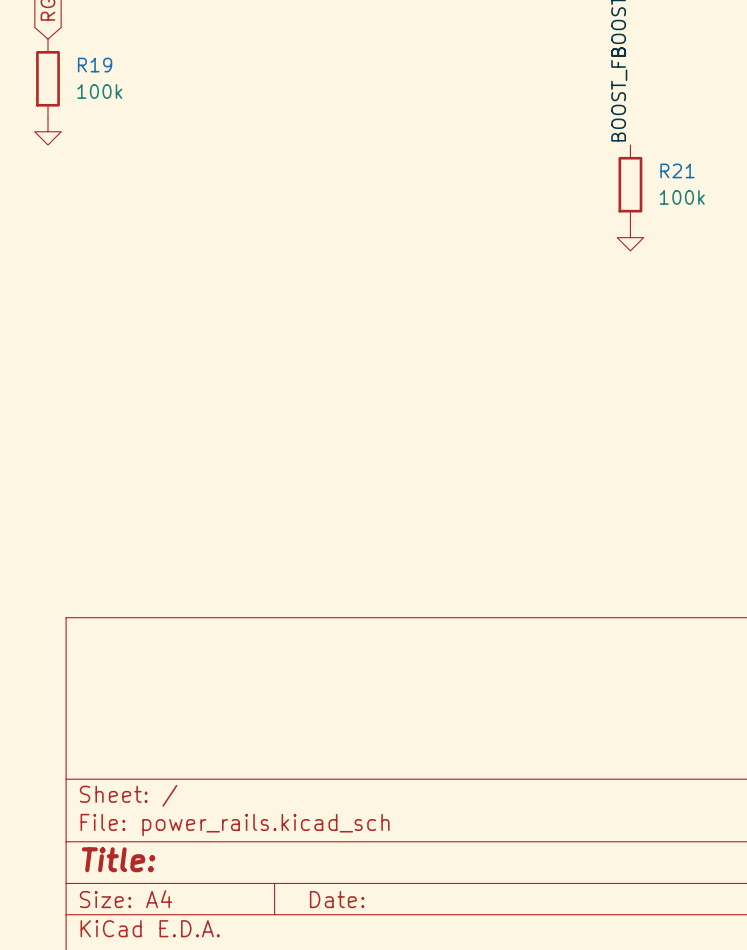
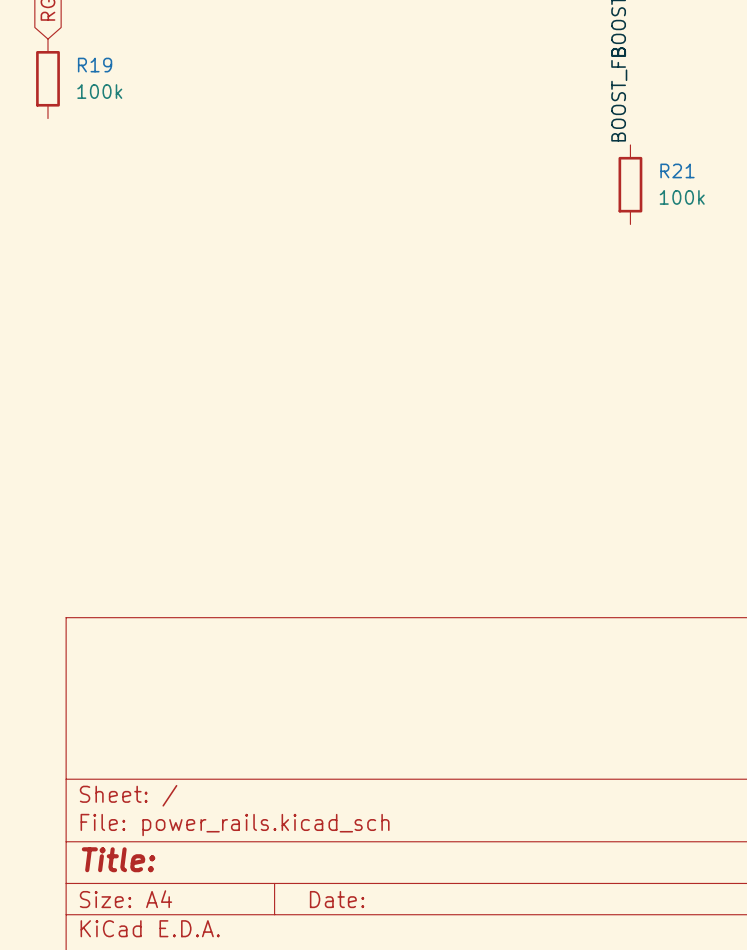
power symbol: (47, 131) -> none
power symbol: (630, 237) -> none

